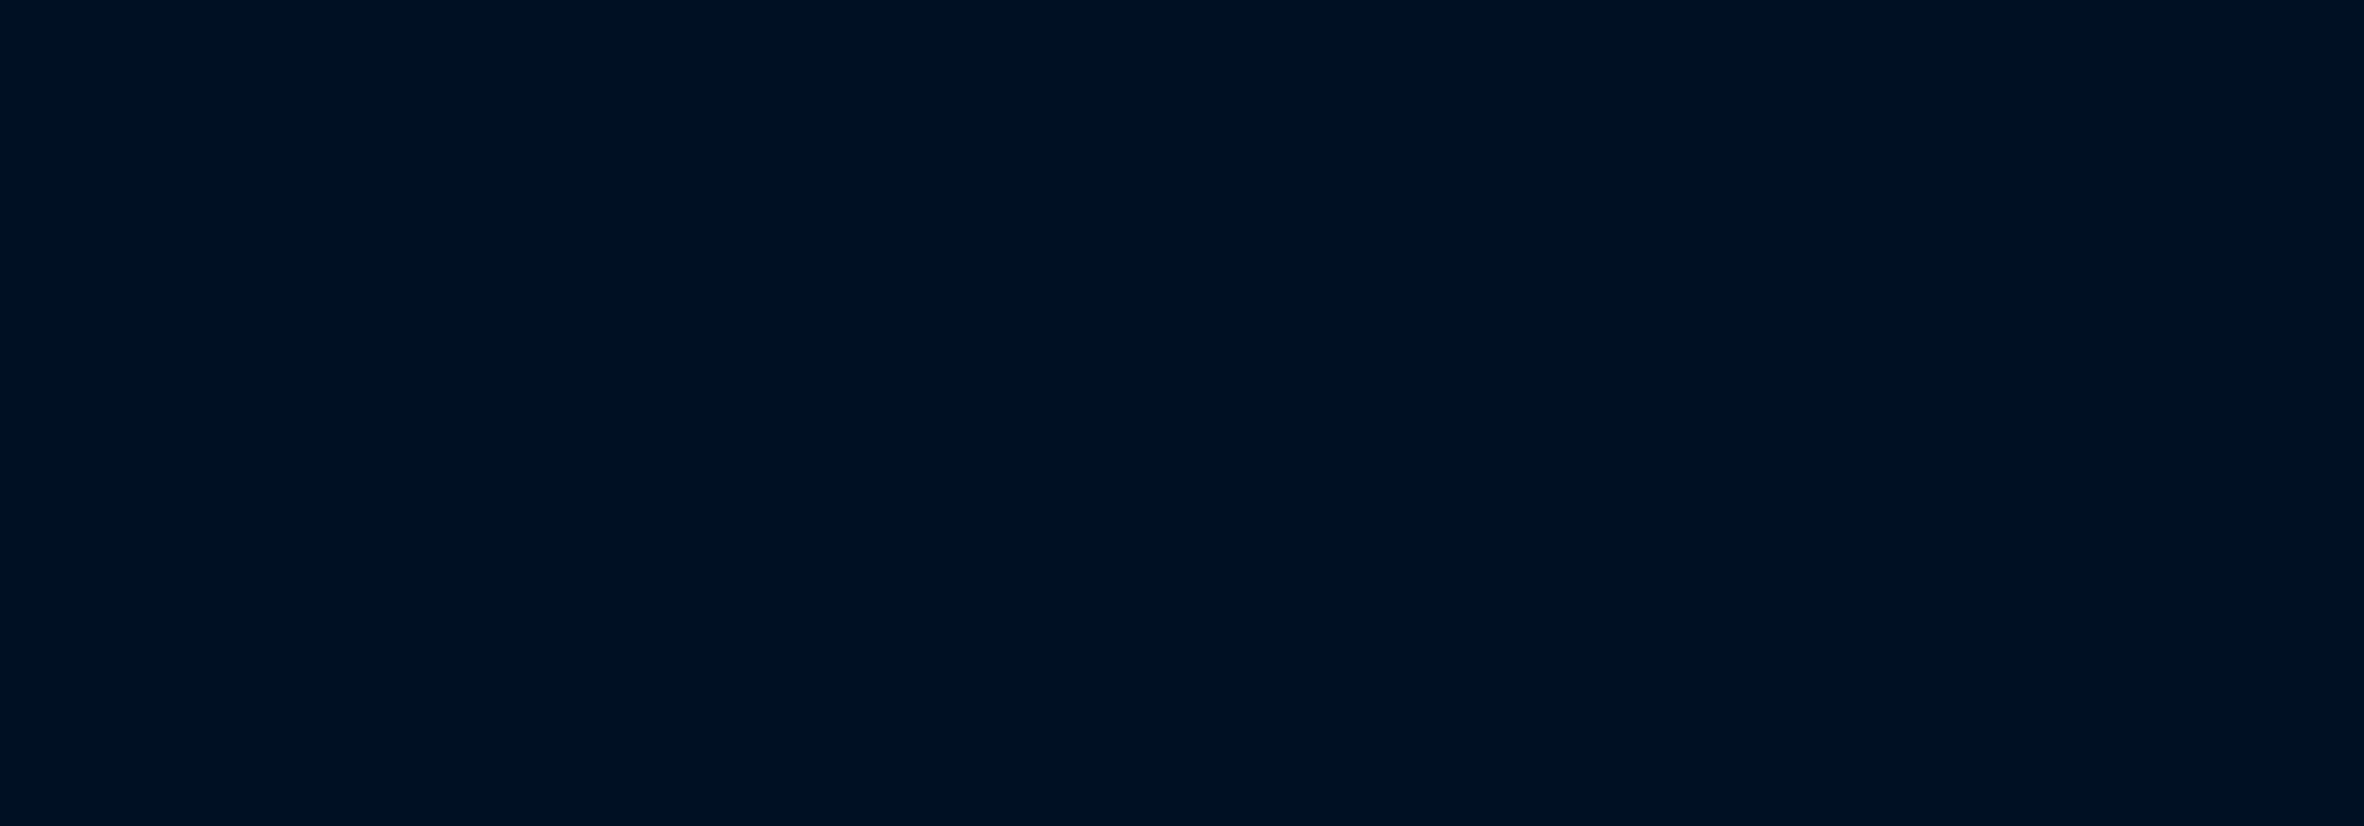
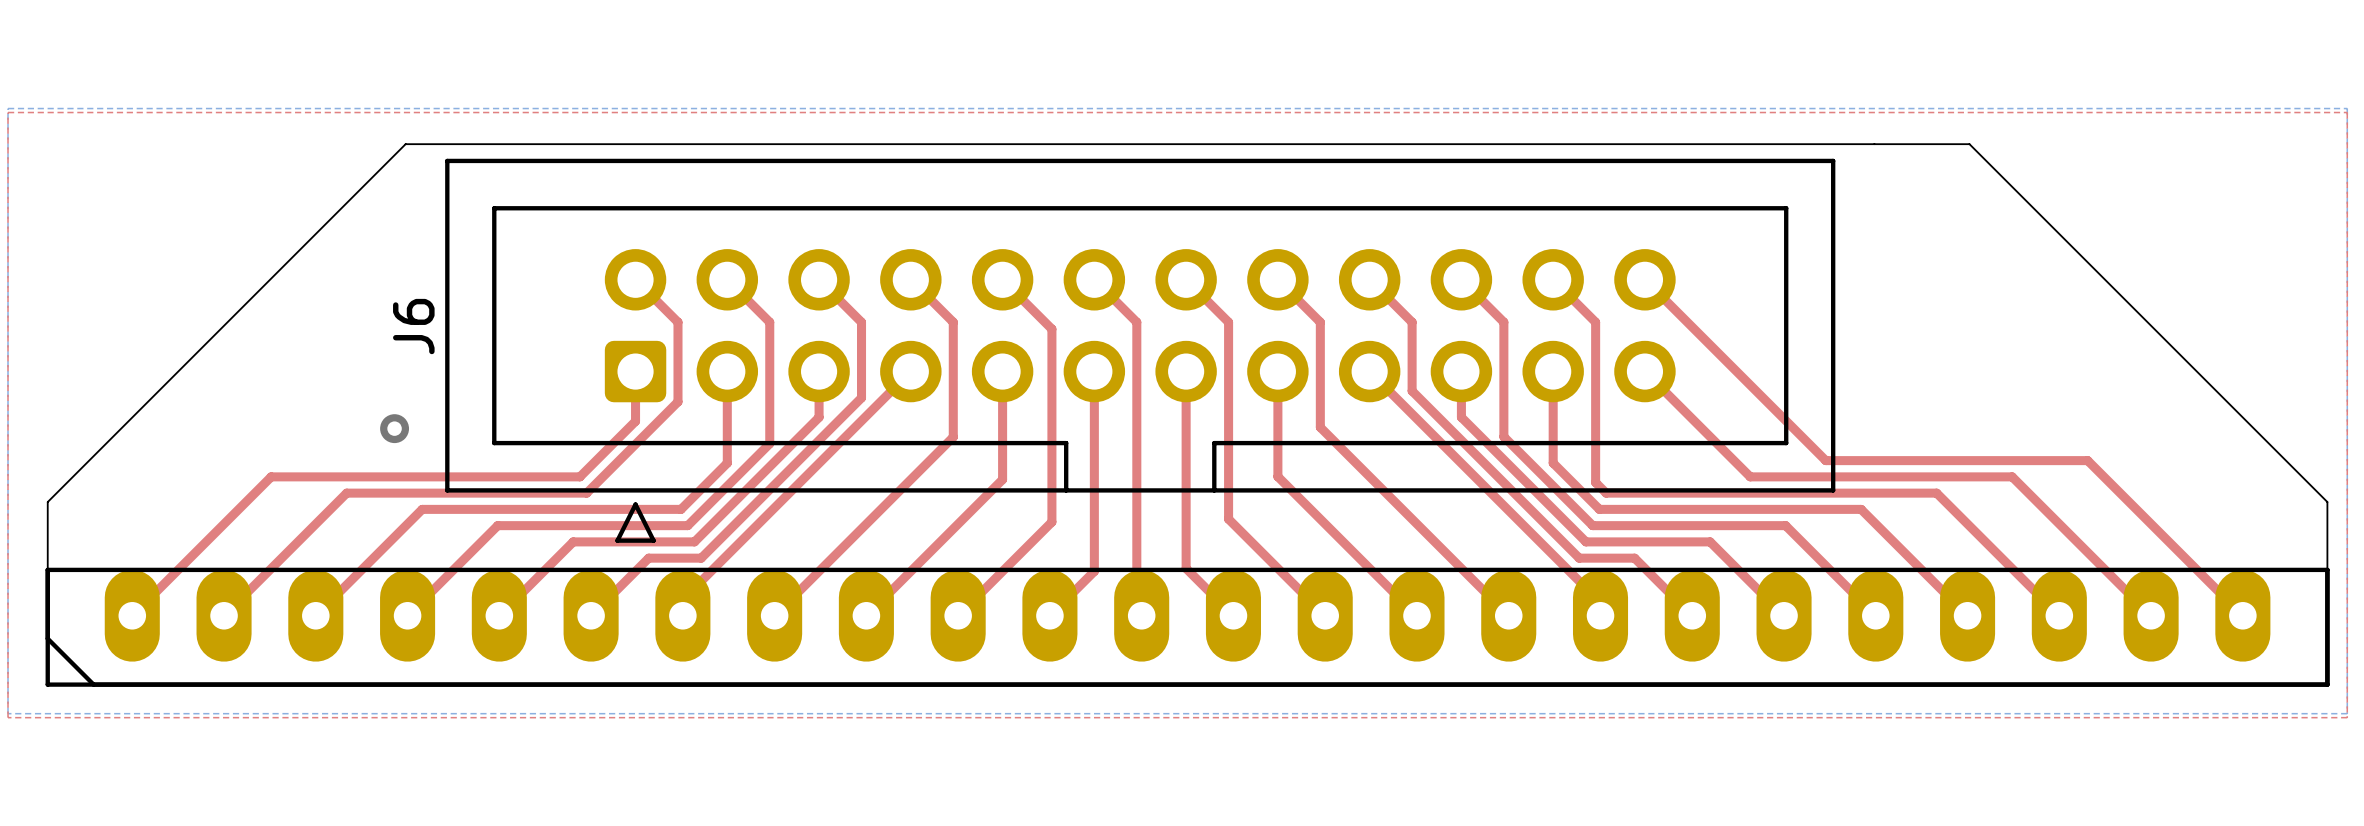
bottom zone outline: none -> (8, 108) (8, 713) (2347, 713) (2347, 108) (8, 108)
top zone outline: none -> (8, 112) (8, 717) (2347, 717) (2347, 112) (8, 112)
top track: none -> (635, 279) (677, 322) (677, 401) (586, 493) (346, 493) (224, 615)
top track: none -> (727, 279) (769, 322) (769, 443) (687, 525) (497, 525) (407, 615)
top track: none -> (819, 279) (861, 322) (861, 397) (701, 558) (648, 558) (591, 615)
top track: none -> (910, 279) (953, 322) (953, 437) (774, 615)
top track: none -> (1002, 279) (1051, 329) (1051, 522) (958, 615)
top track: none -> (1094, 279) (1136, 322) (1136, 610) (1141, 615)
top track: none -> (1186, 279) (1228, 322) (1228, 519) (1325, 615)
top track: none -> (1277, 279) (1320, 322) (1320, 427) (1508, 615)
top track: none -> (1369, 279) (1412, 322) (1412, 391) (1579, 558) (1634, 558) (1692, 615)
top track: none -> (1461, 279) (1503, 322) (1503, 436) (1592, 525) (1785, 525) (1875, 615)
top track: none -> (1553, 279) (1595, 322) (1595, 482) (1606, 493) (1936, 493) (2059, 615)
top track: none -> (1644, 279) (1825, 460) (2087, 460) (2242, 615)
J6: none -> (1140, 350)
top track: none -> (635, 371) (635, 421) (579, 476) (271, 476) (132, 615)
top track: none -> (727, 371) (727, 463) (681, 509) (422, 509) (315, 615)
top track: none -> (819, 371) (819, 417) (694, 541) (573, 541) (499, 615)
top track: none -> (910, 371) (682, 599) (682, 615)
top track: none -> (1002, 371) (1002, 479) (866, 615)
top track: none -> (1094, 371) (1094, 571) (1049, 615)
top track: none -> (1186, 371) (1186, 568) (1233, 615)
top track: none -> (1277, 371) (1277, 476) (1416, 615)
top track: none -> (1369, 371) (1600, 602) (1600, 615)
top track: none -> (1461, 371) (1461, 417) (1585, 541) (1710, 541) (1784, 615)
top track: none -> (1553, 371) (1553, 463) (1599, 509) (1861, 509) (1967, 615)
top track: none -> (1644, 371) (1750, 476) (2012, 476) (2151, 615)
via: none -> (394, 428)
board edge: none -> (47, 569) (47, 502) (405, 144) (1969, 144) (2327, 502) (2327, 569)
part: none -> (1187, 627)

